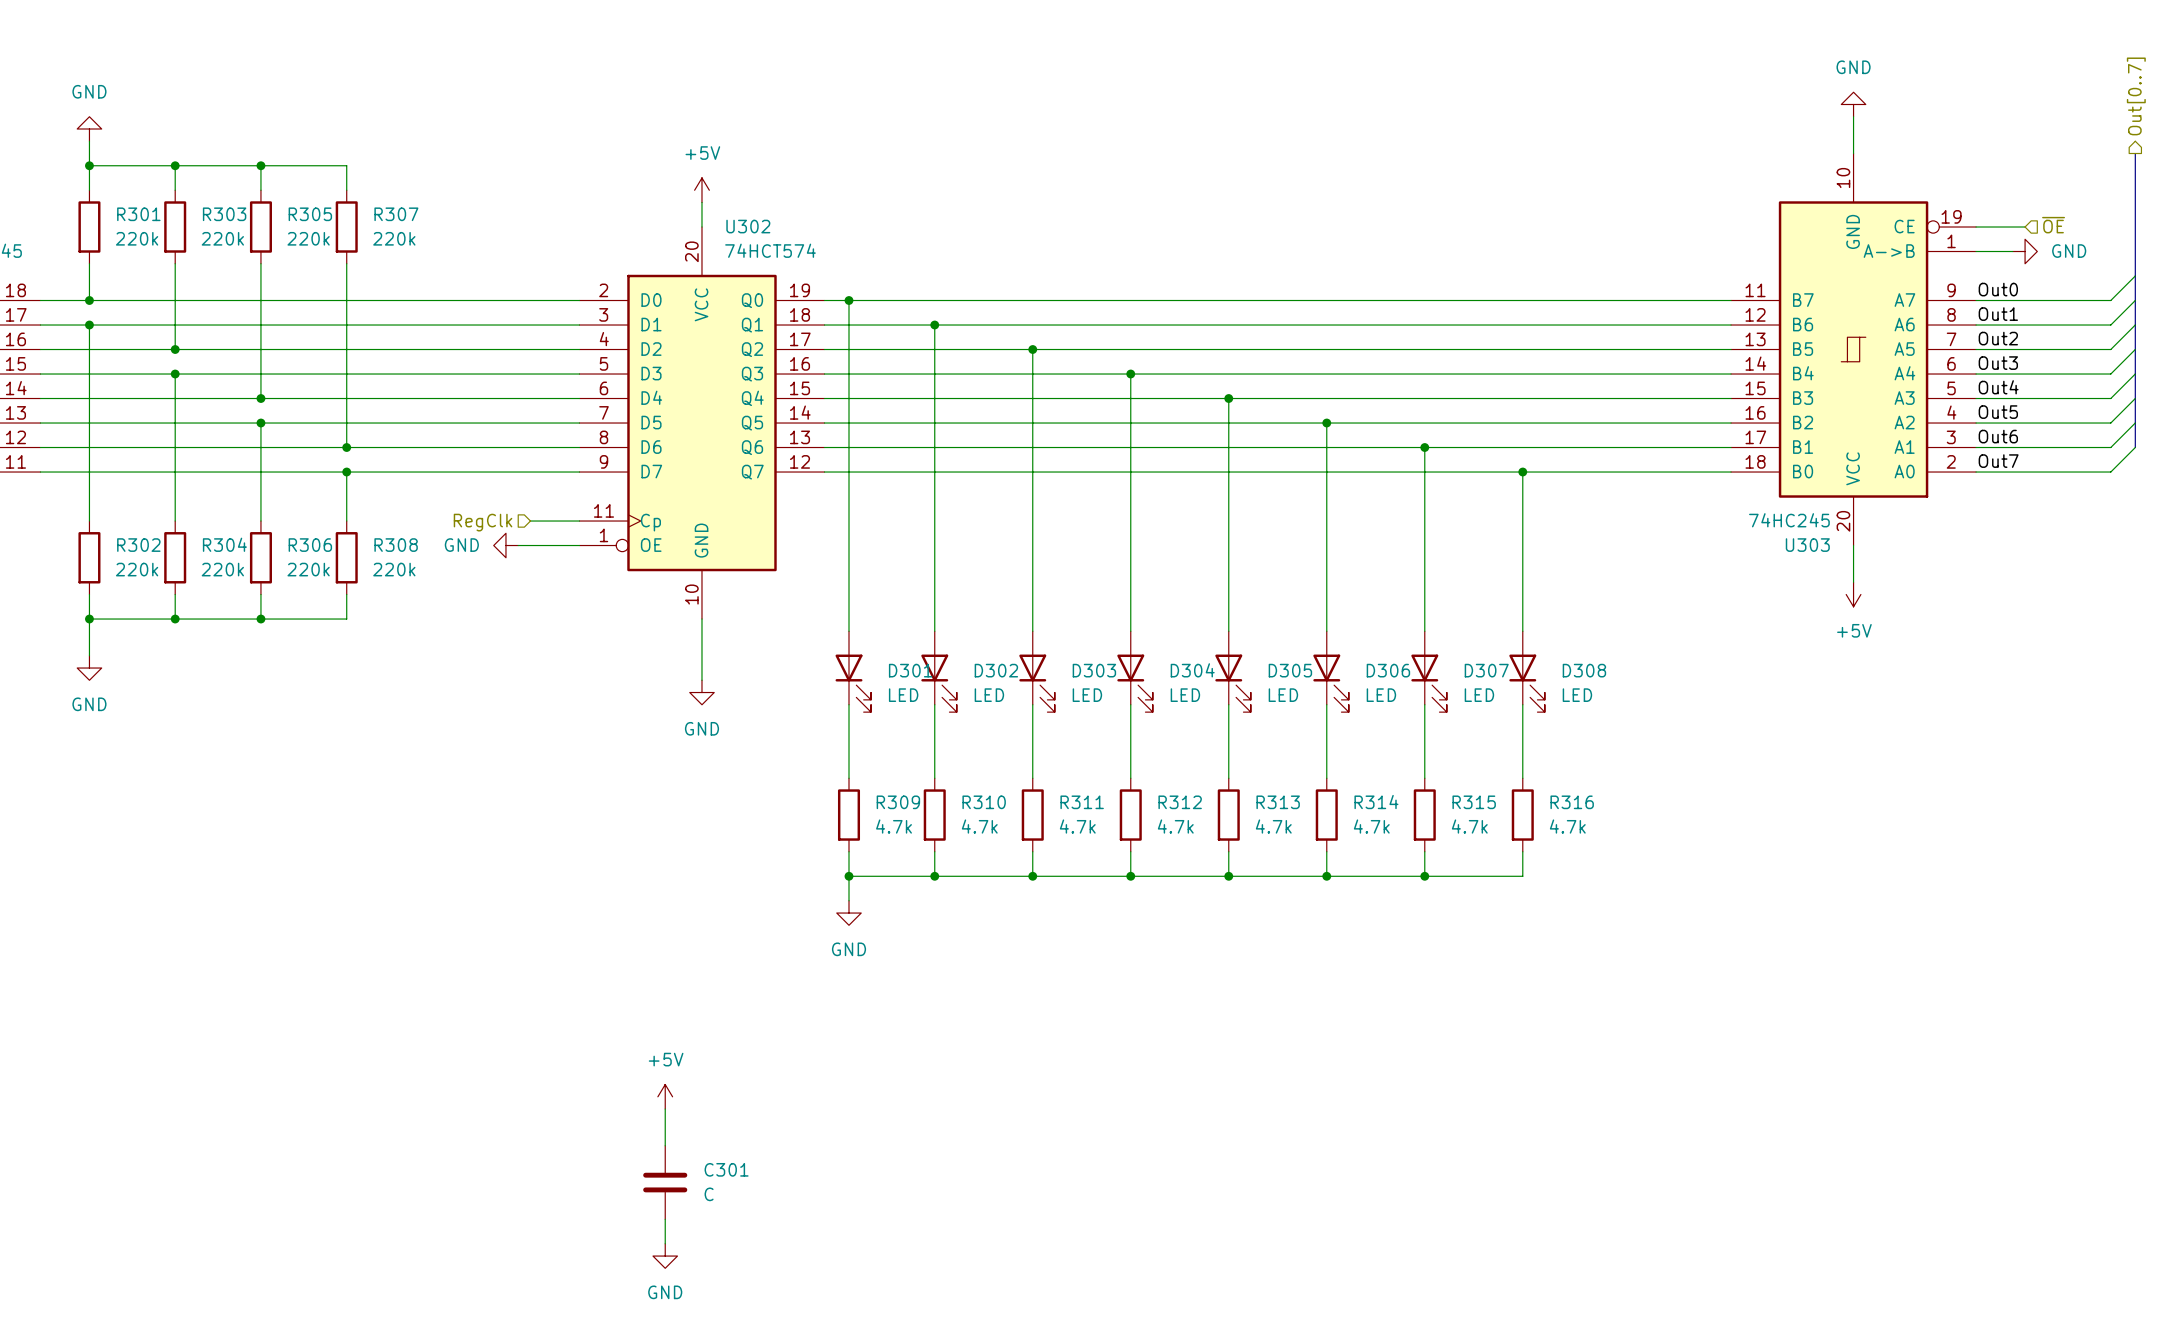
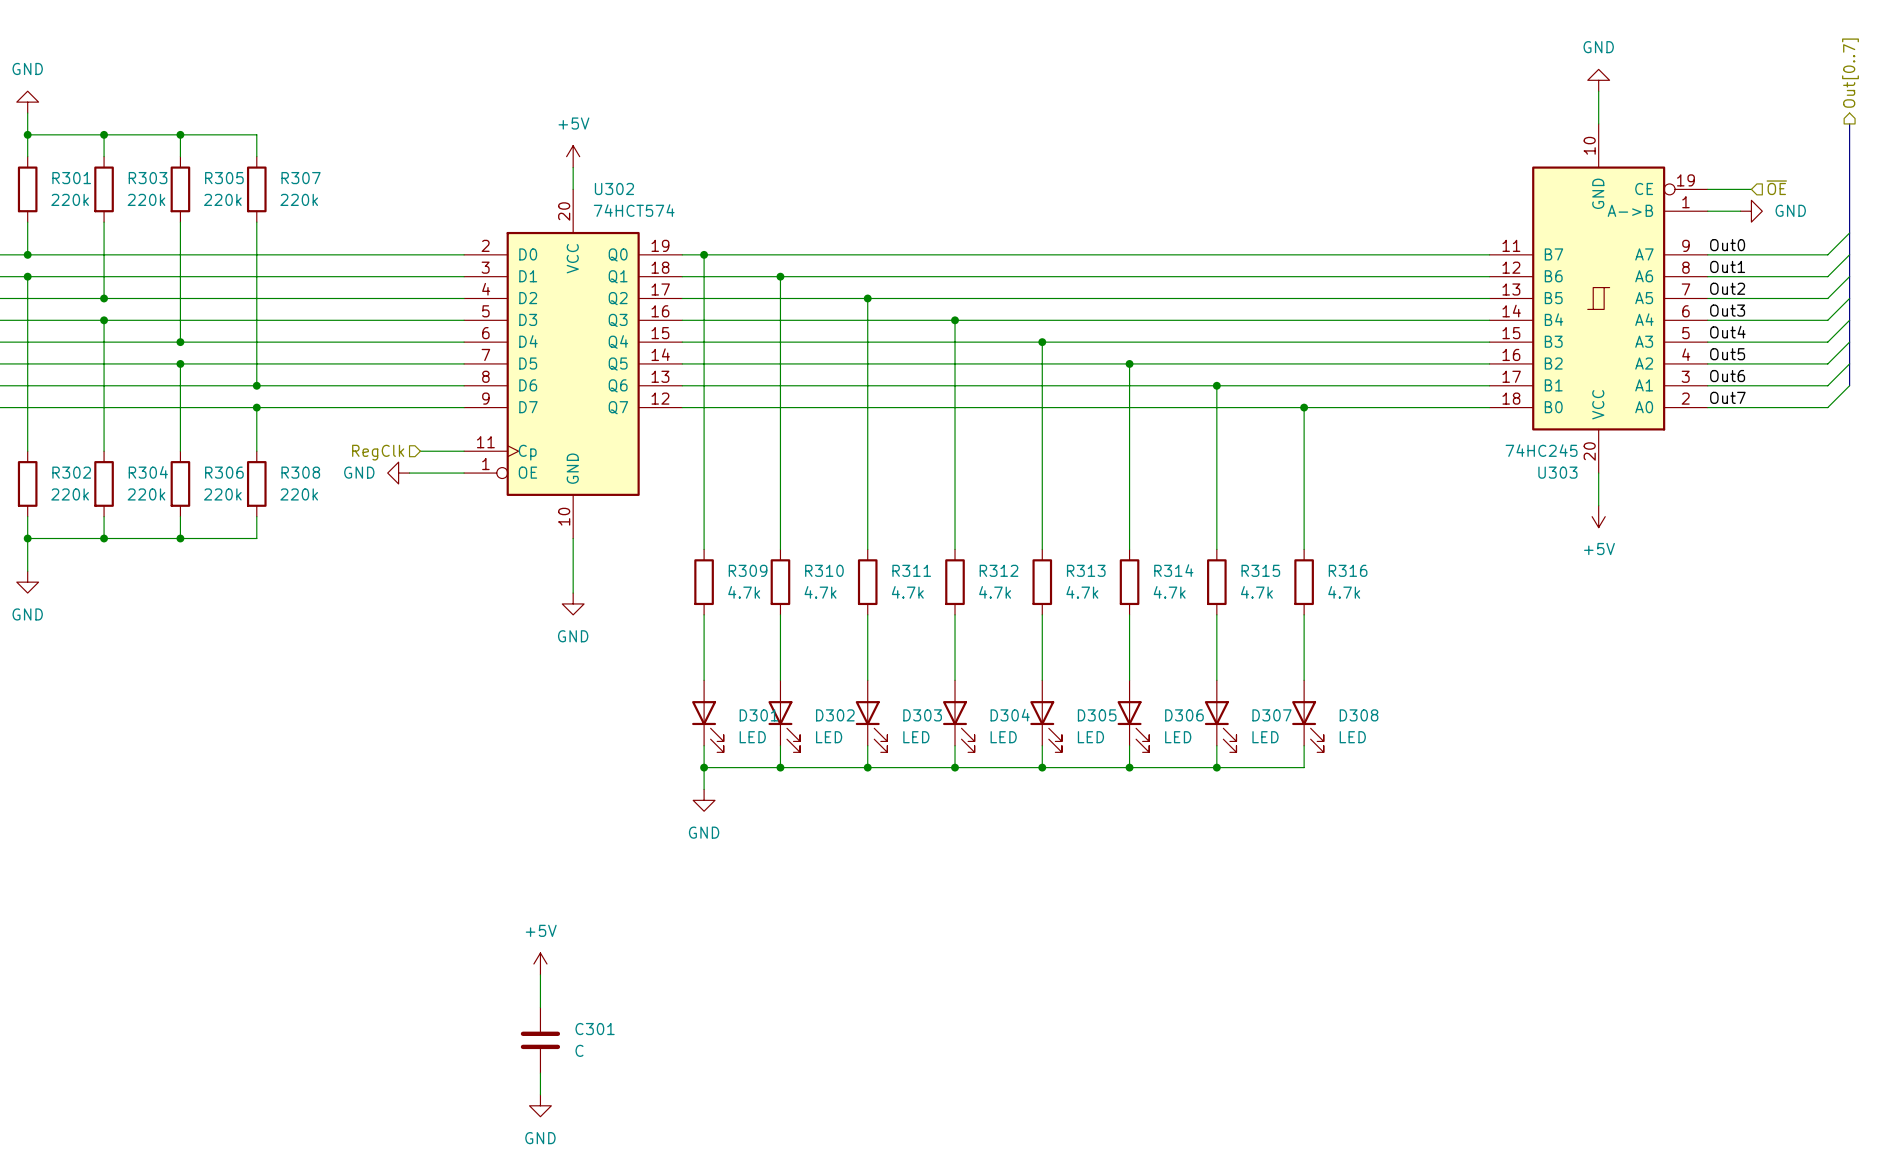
D301 position: (853, 671) -> (707, 716)
D302 position: (939, 671) -> (784, 716)
D303 position: (1037, 671) -> (871, 716)
D304 position: (1135, 671) -> (958, 716)
D305 position: (1233, 671) -> (1046, 716)
D306 position: (1331, 671) -> (1133, 716)
D307 position: (1429, 671) -> (1220, 716)
D308 position: (1527, 671) -> (1307, 716)
R309 position: (848, 815) -> (704, 582)
R310 position: (934, 815) -> (780, 582)
R311 position: (1032, 815) -> (867, 582)
R312 position: (1130, 815) -> (955, 582)
R313 position: (1228, 815) -> (1042, 582)
R314 position: (1326, 815) -> (1129, 582)
R315 position: (1424, 815) -> (1216, 582)
R316 position: (1522, 815) -> (1304, 582)

